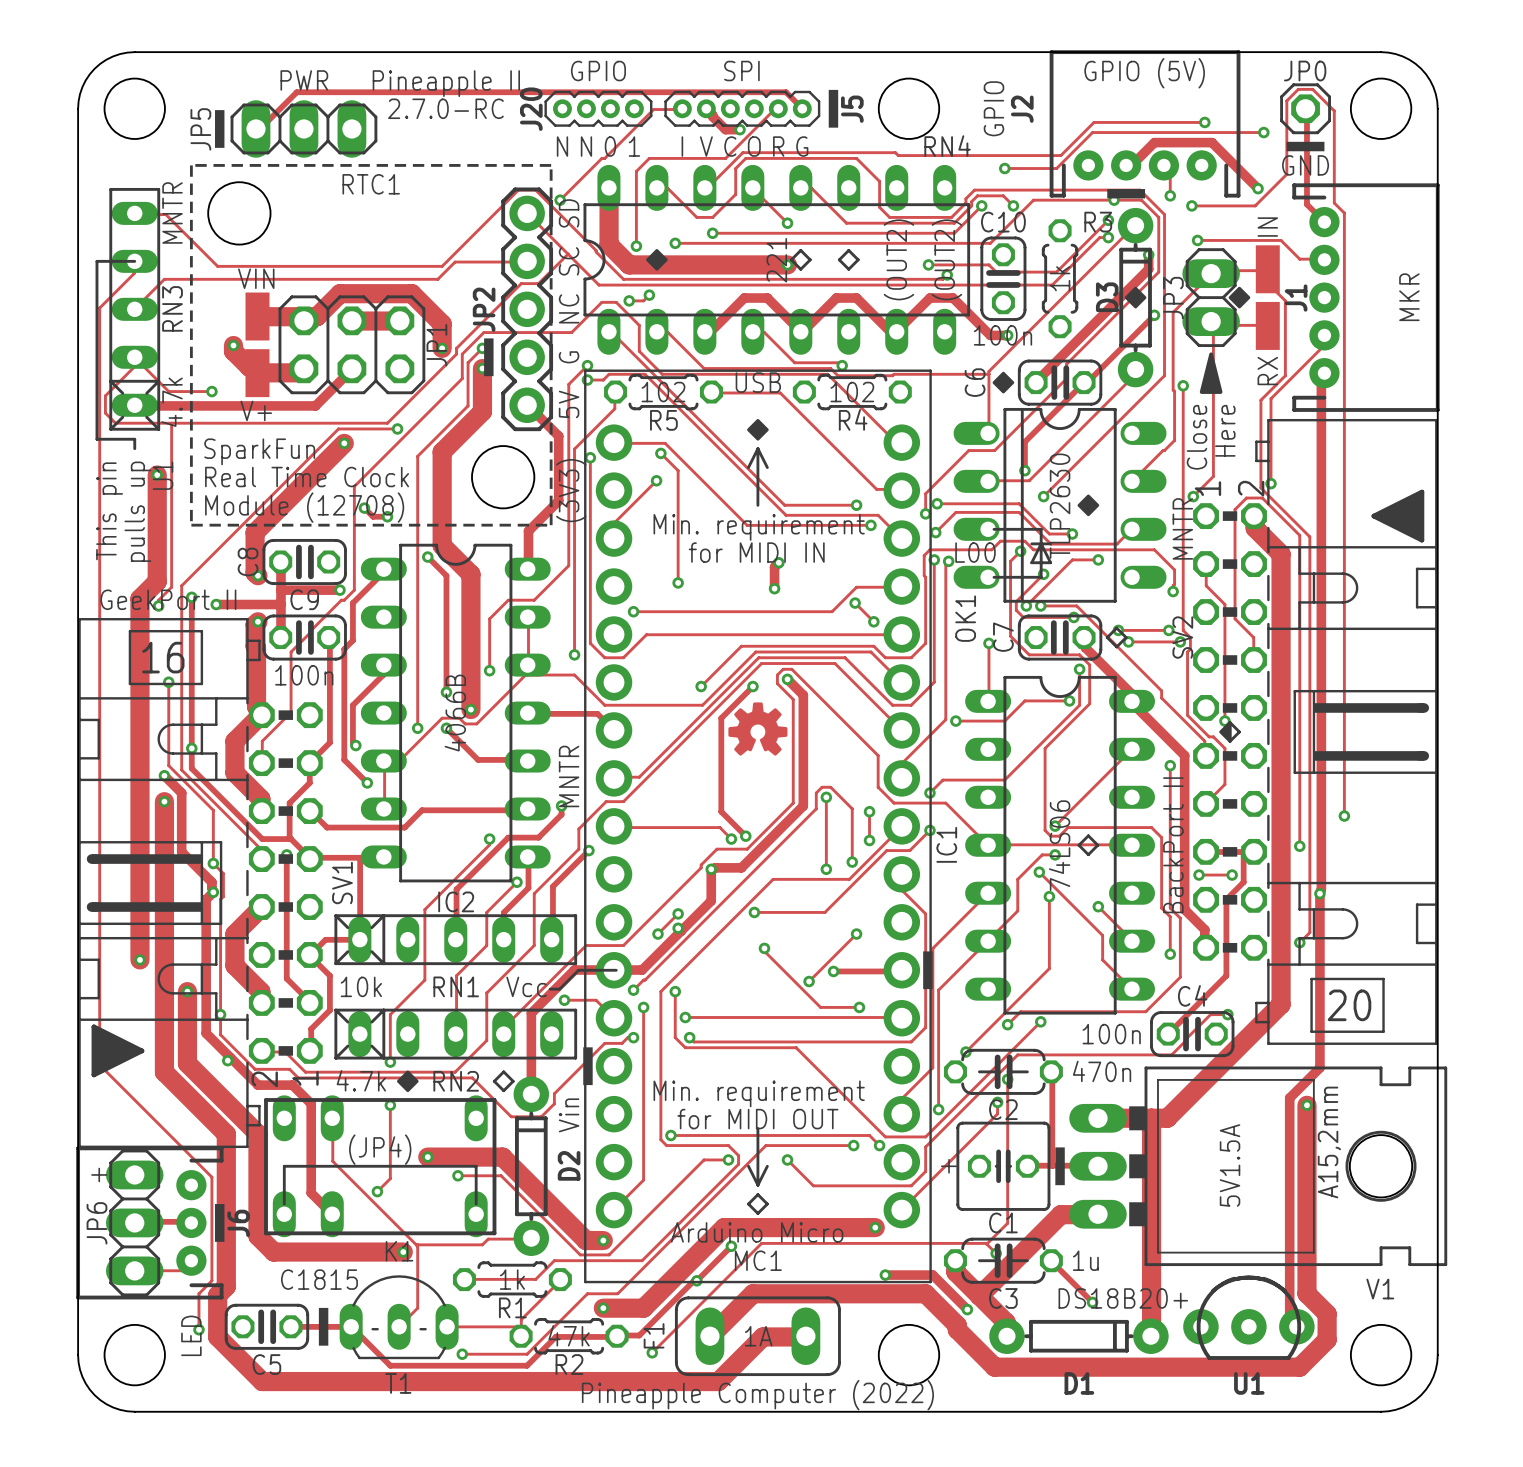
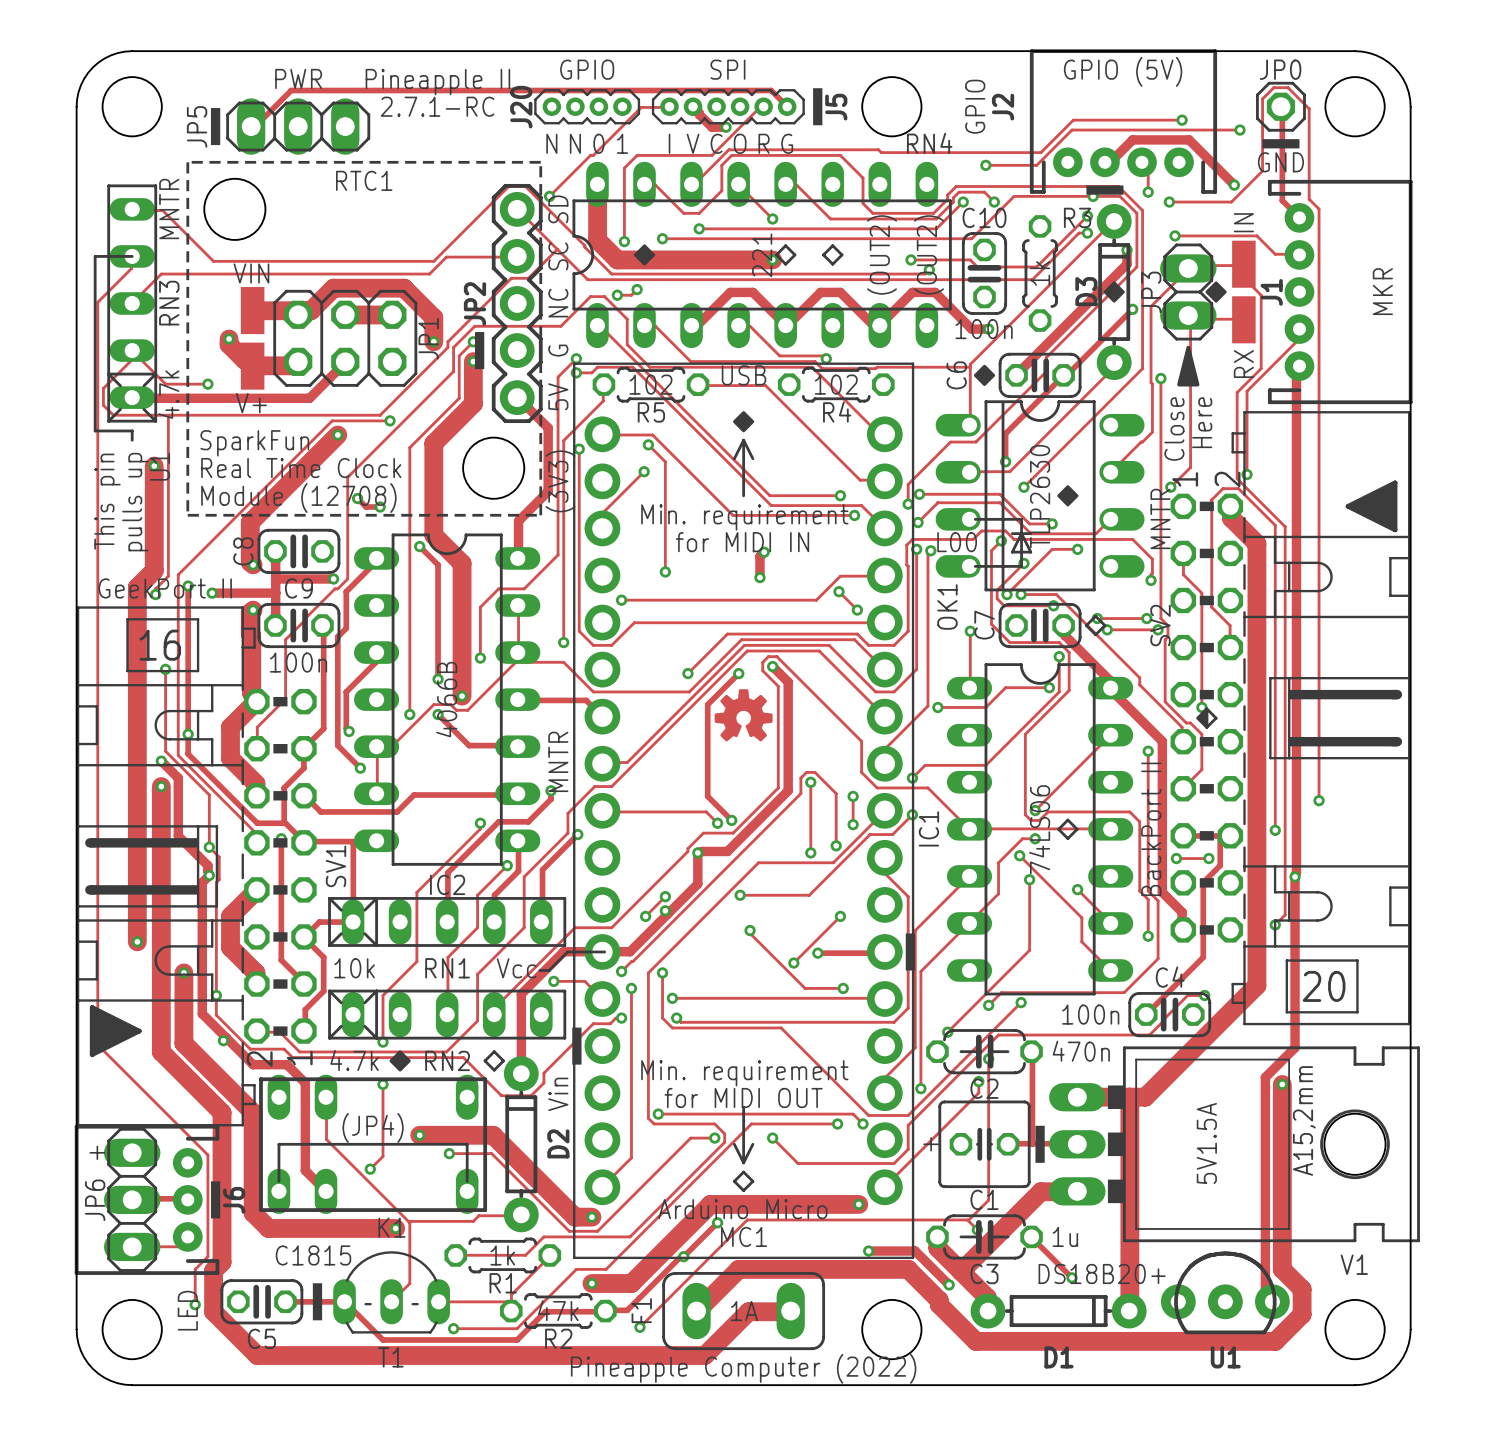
text: 2.7.0-RC (445, 108) -> 2.7.1-RC (437, 106)

